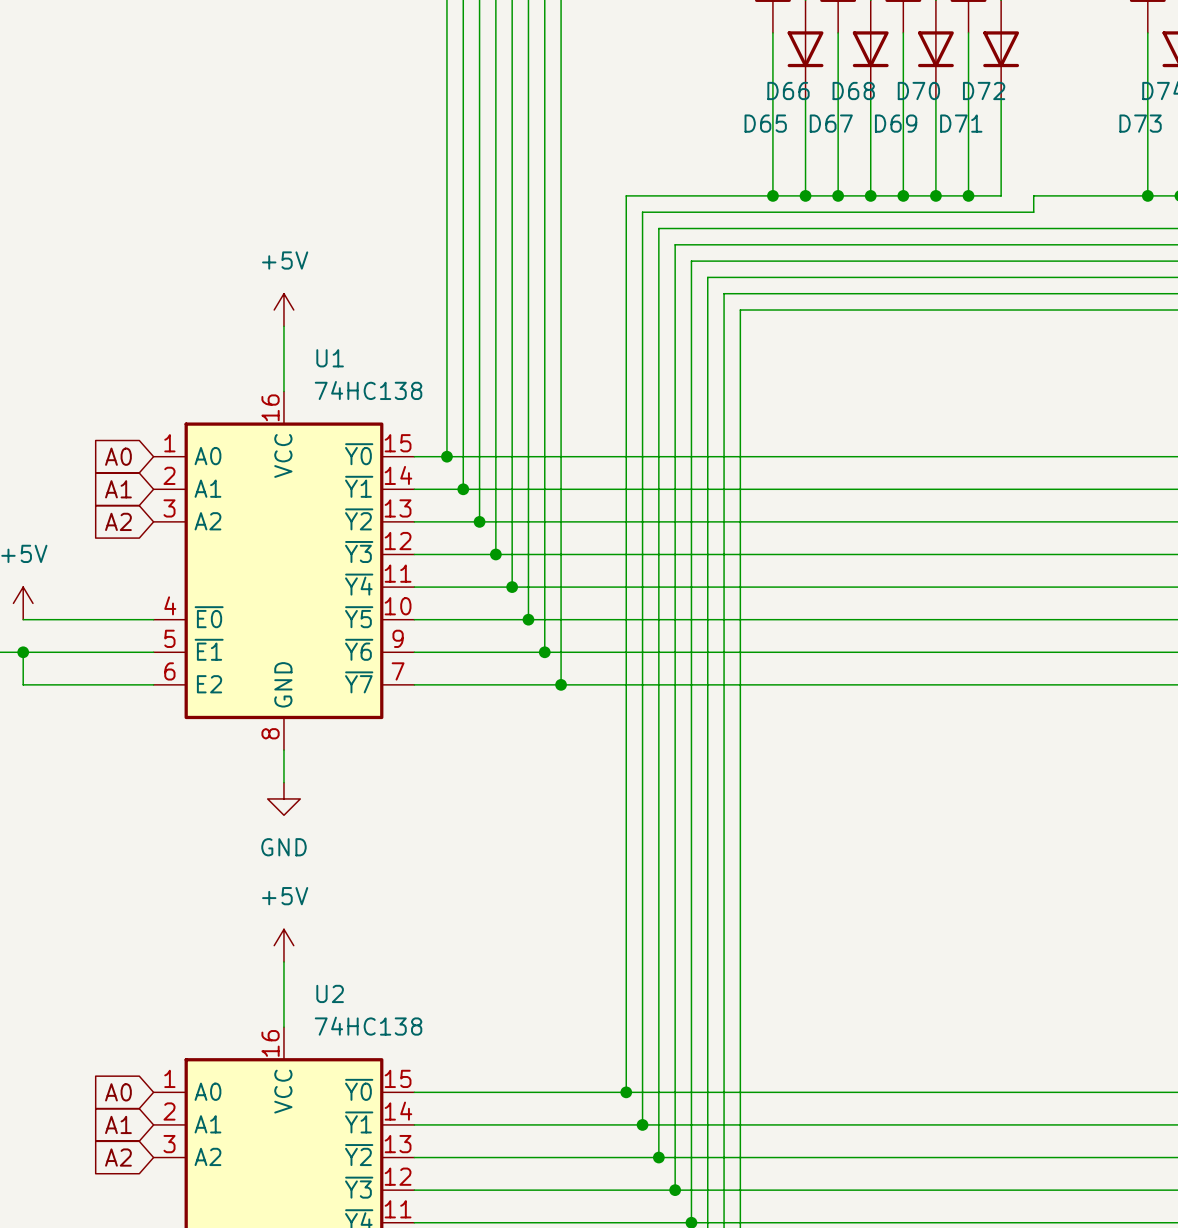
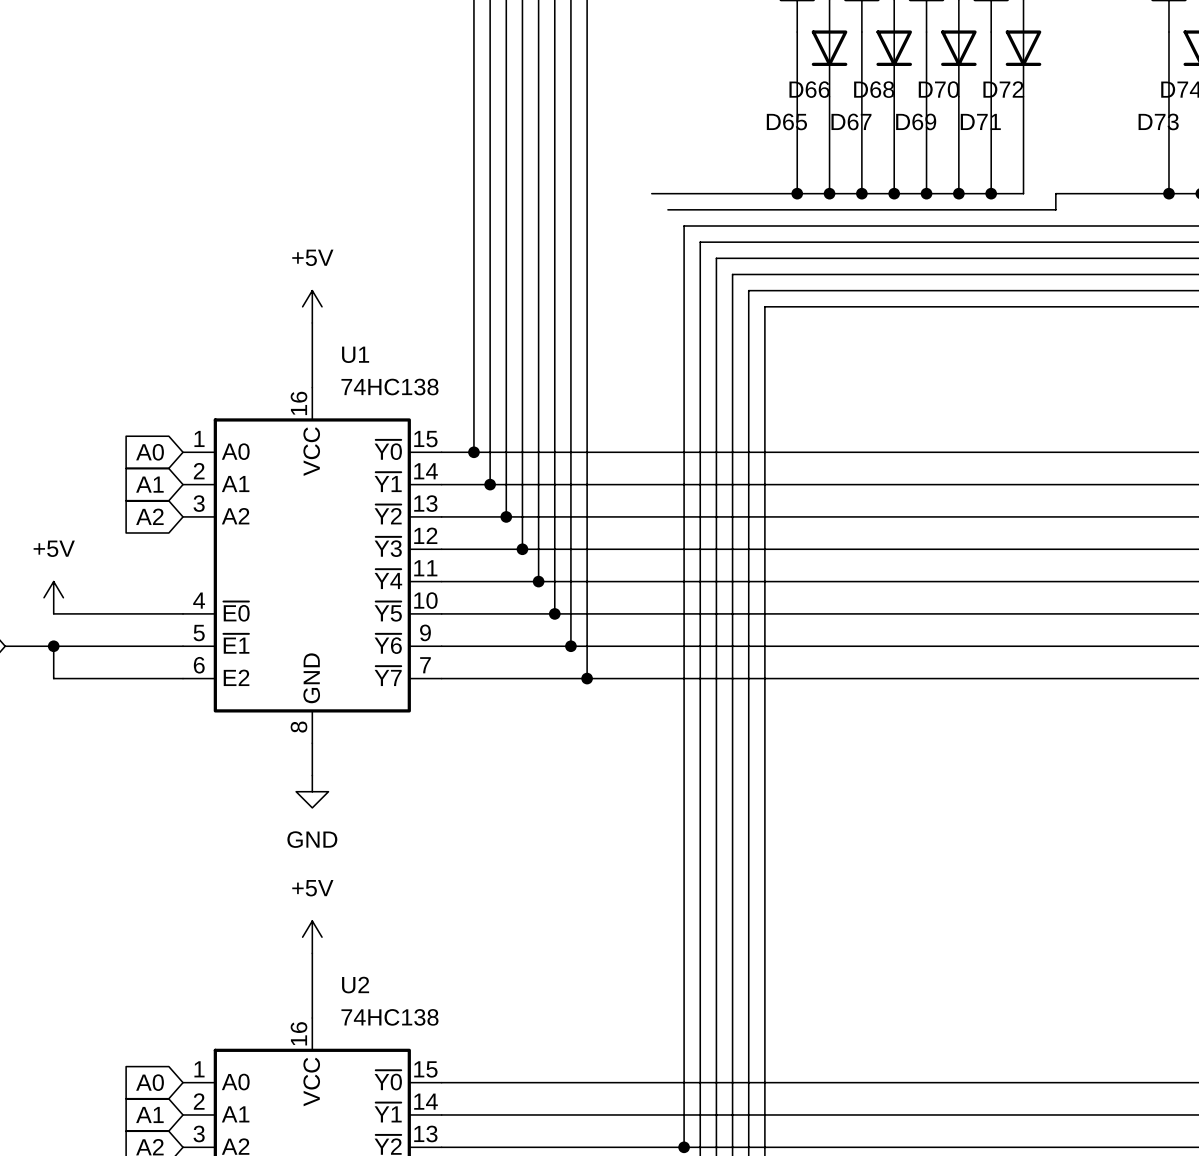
wire: (626, 195) (626, 1092) -> none
wire: (642, 212) (642, 1124) -> none
junction: (626, 1092) -> none
junction: (642, 1124) -> none

